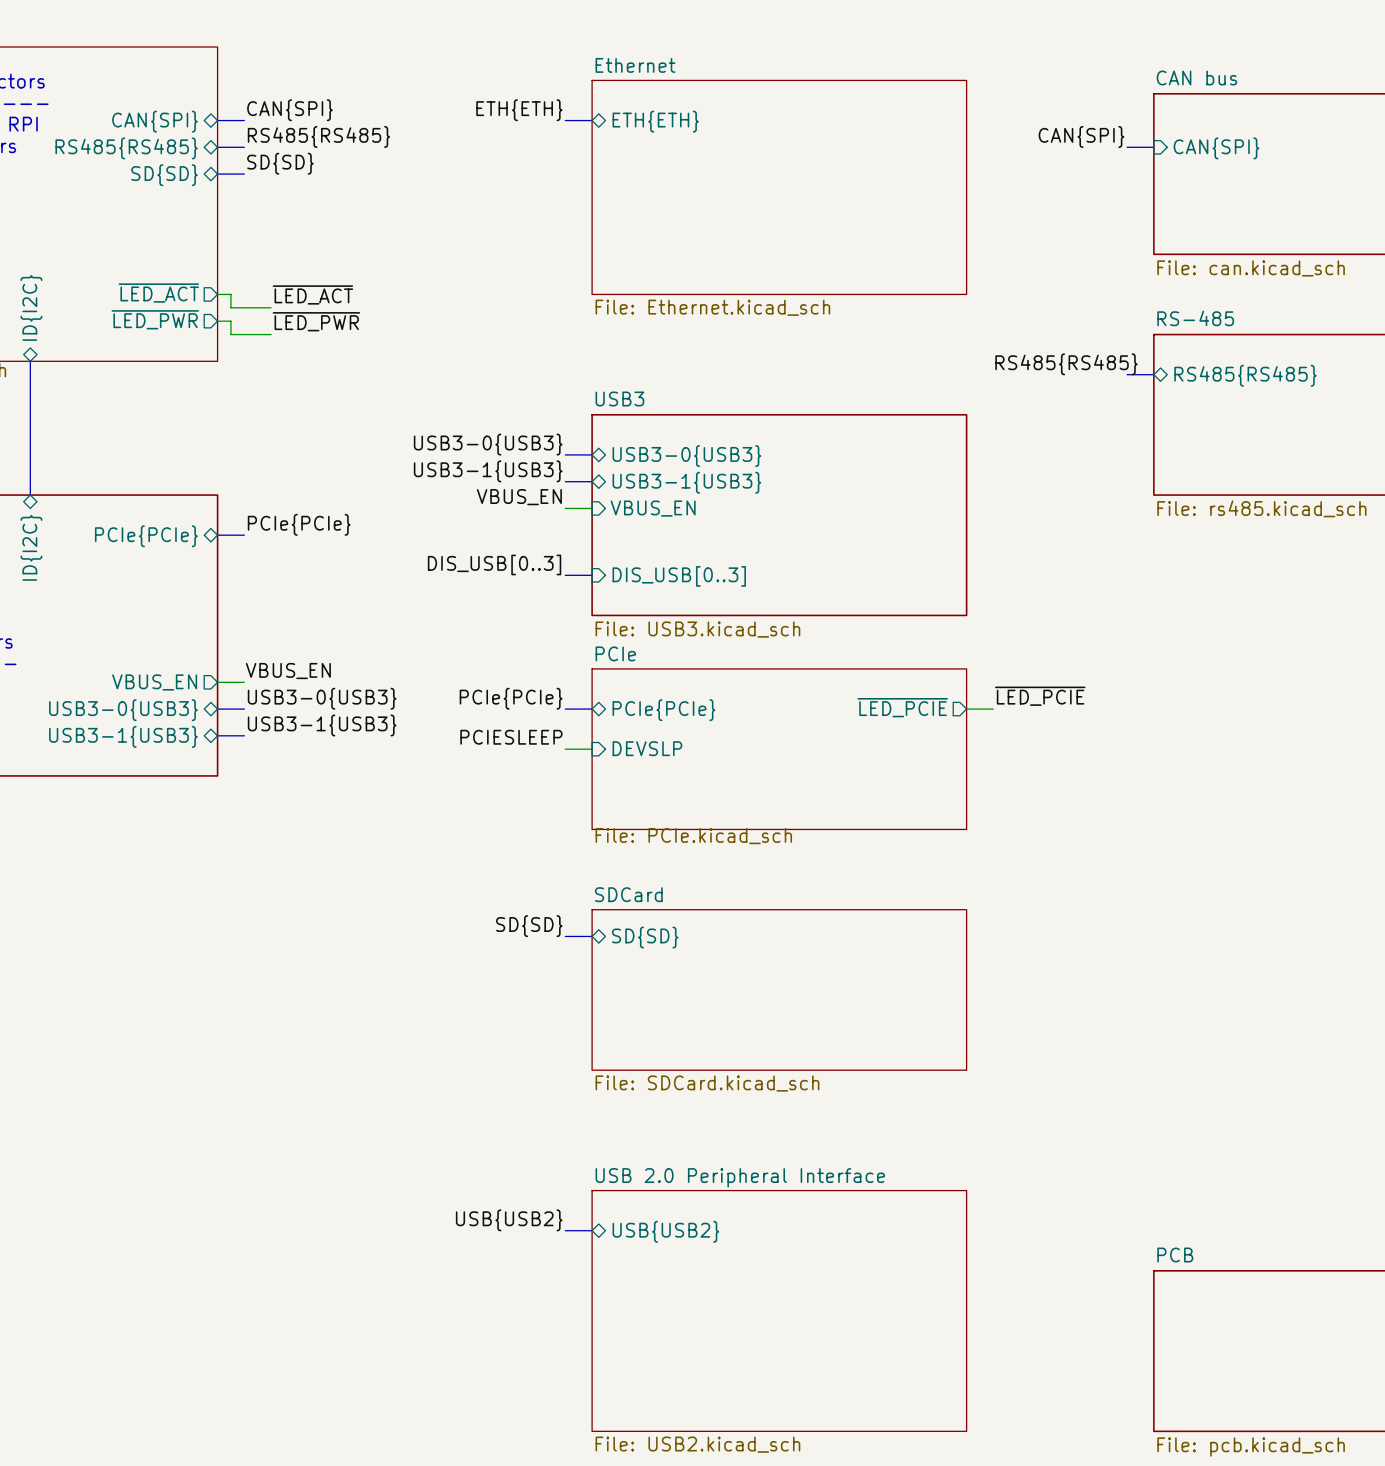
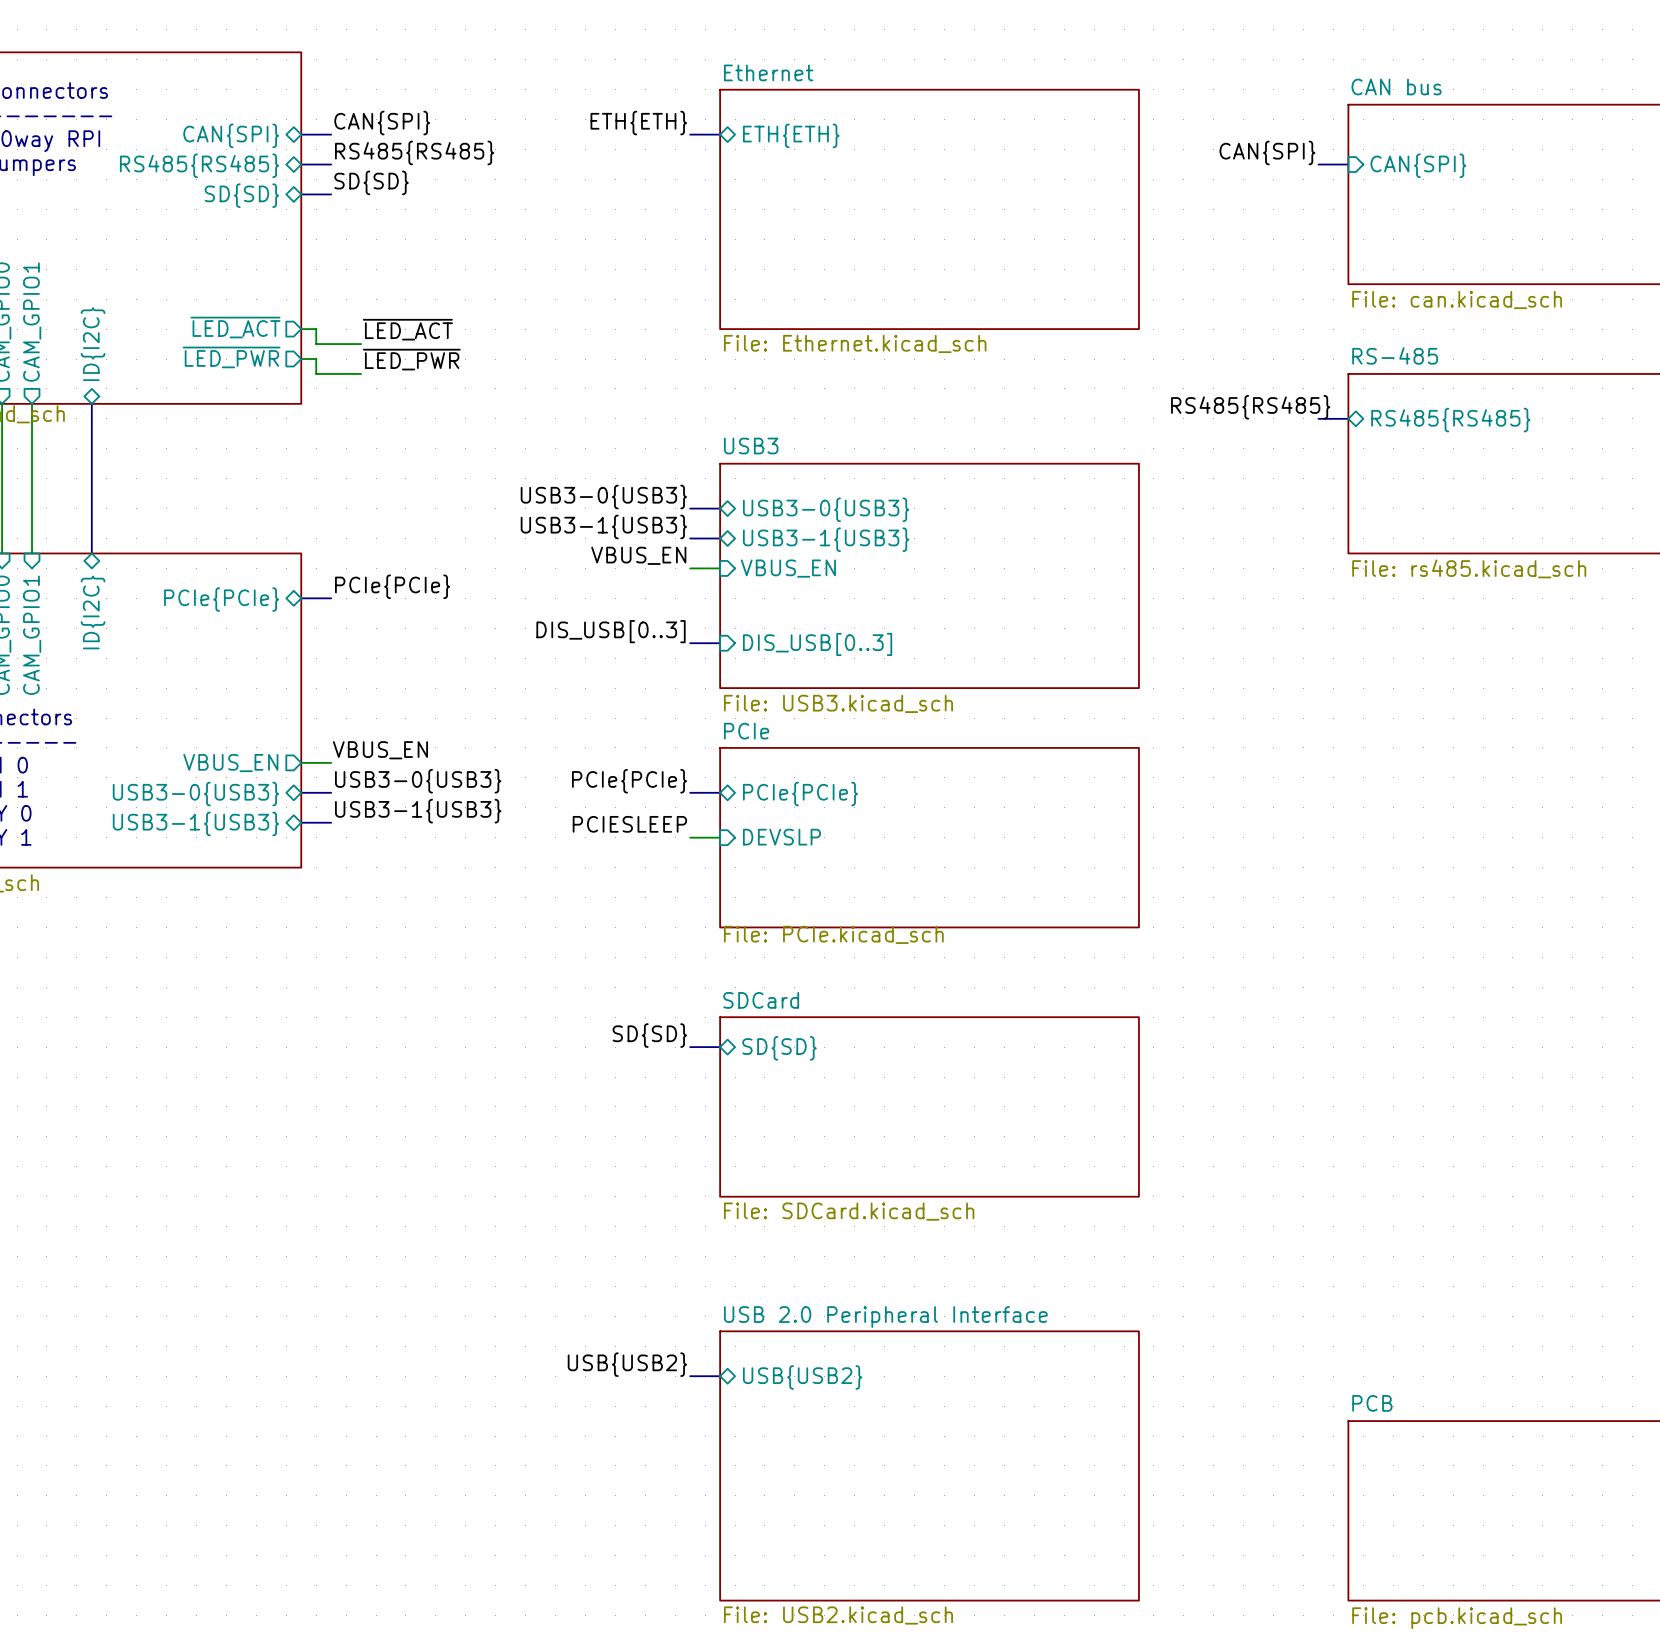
label: ~{LED_PCIE} (1040, 696) -> none
sheet pin: ~{LED_PCIE} (902, 707) -> none
wire: (966, 709) (993, 709) -> none

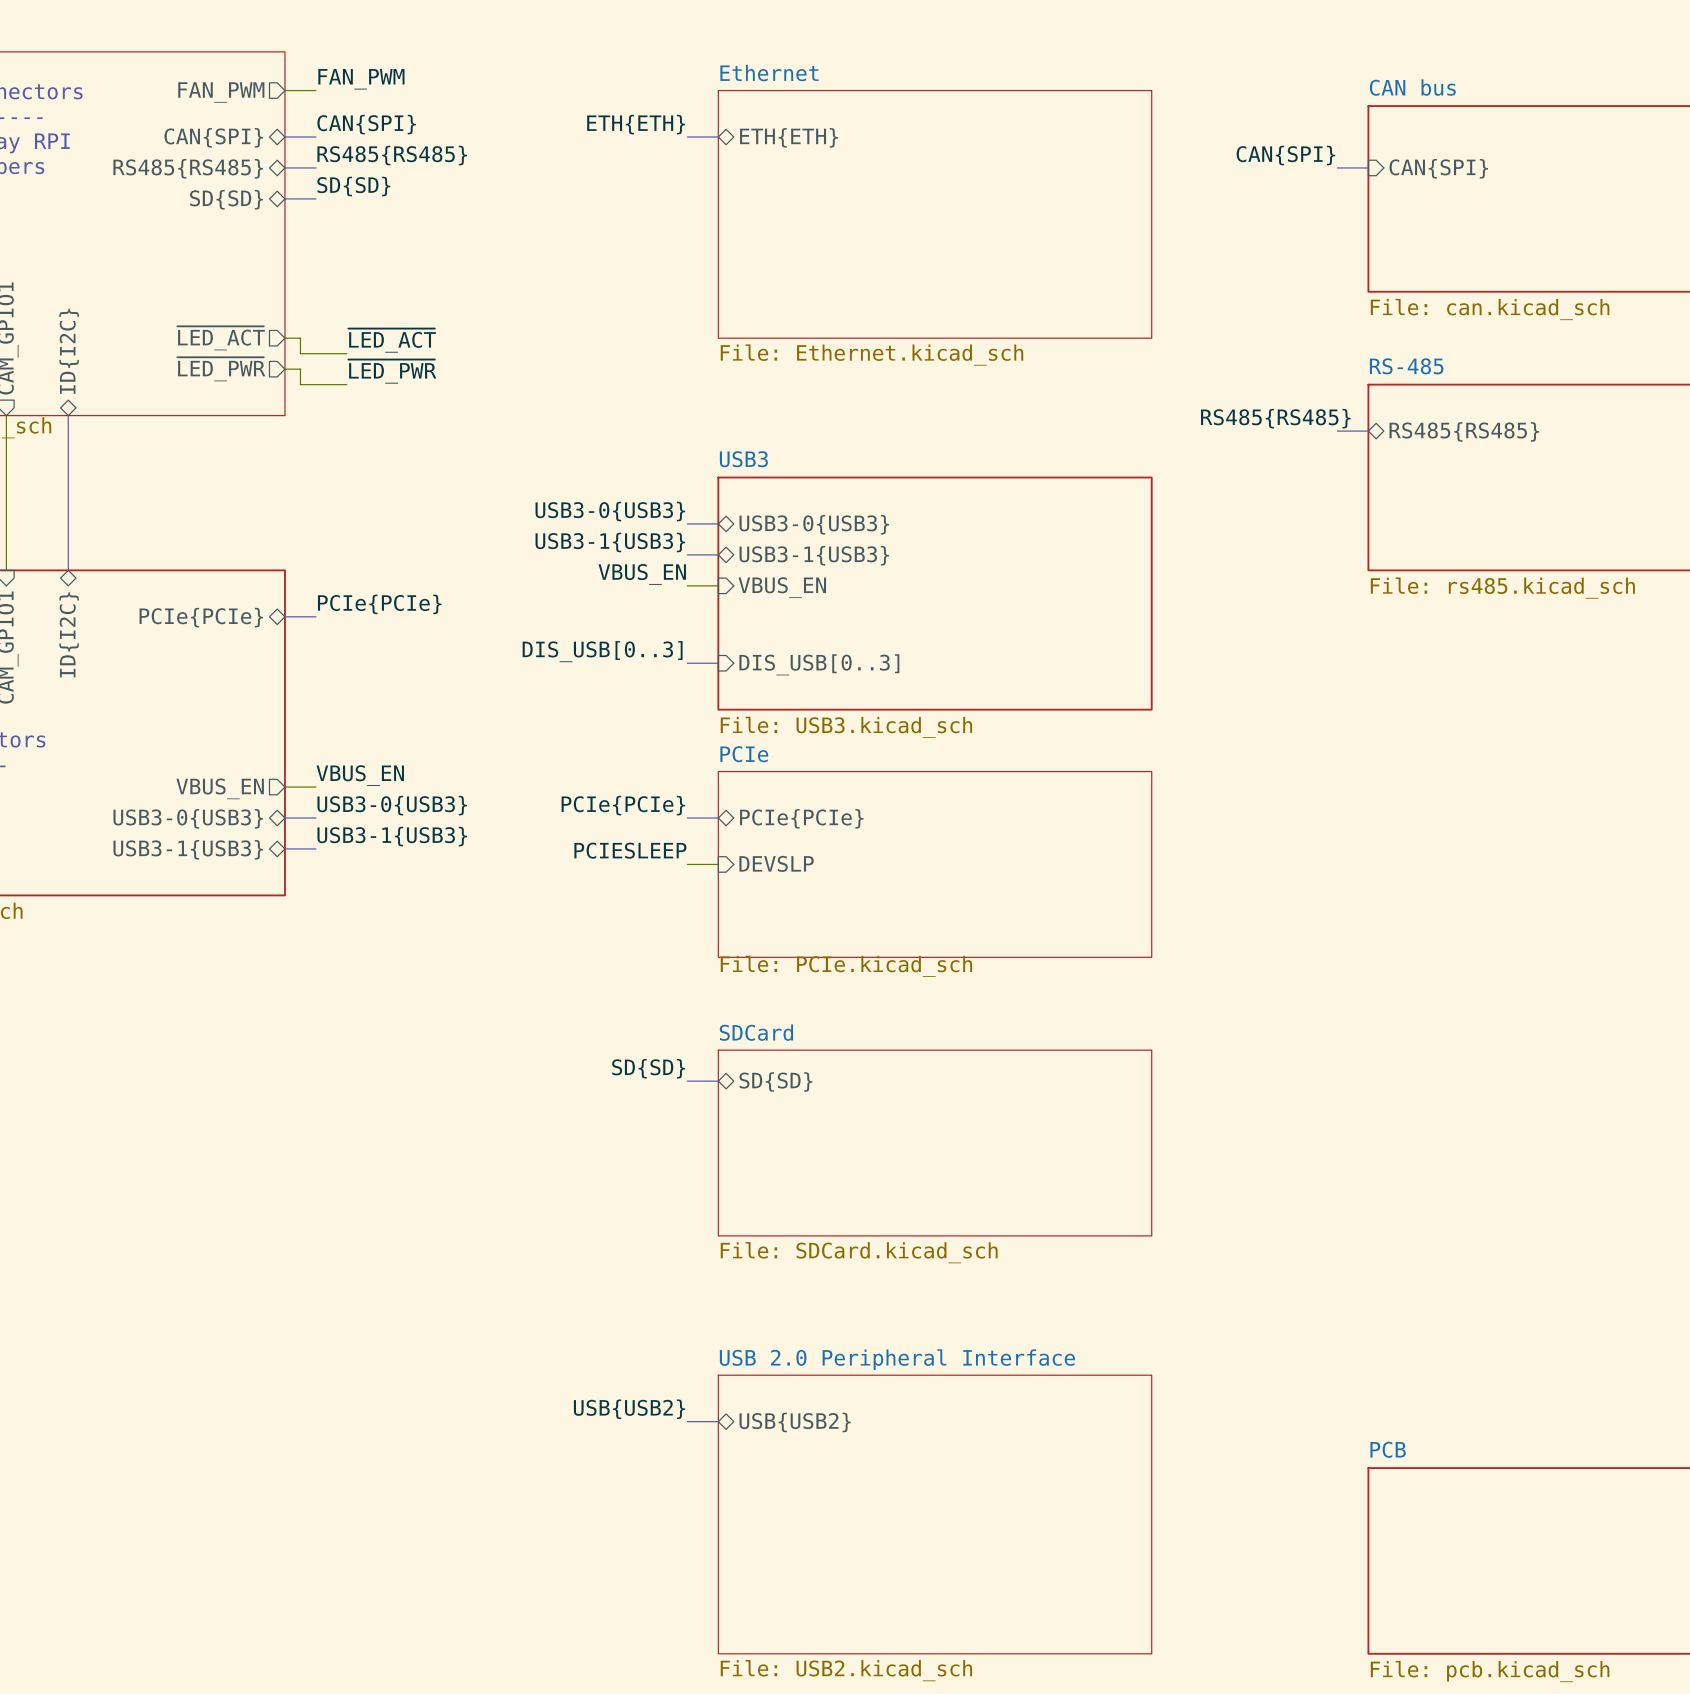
label: none -> FAN_PWM (361, 79)
sheet pin: none -> FAN_PWM (221, 92)
wire: none -> (284, 90) (315, 90)

